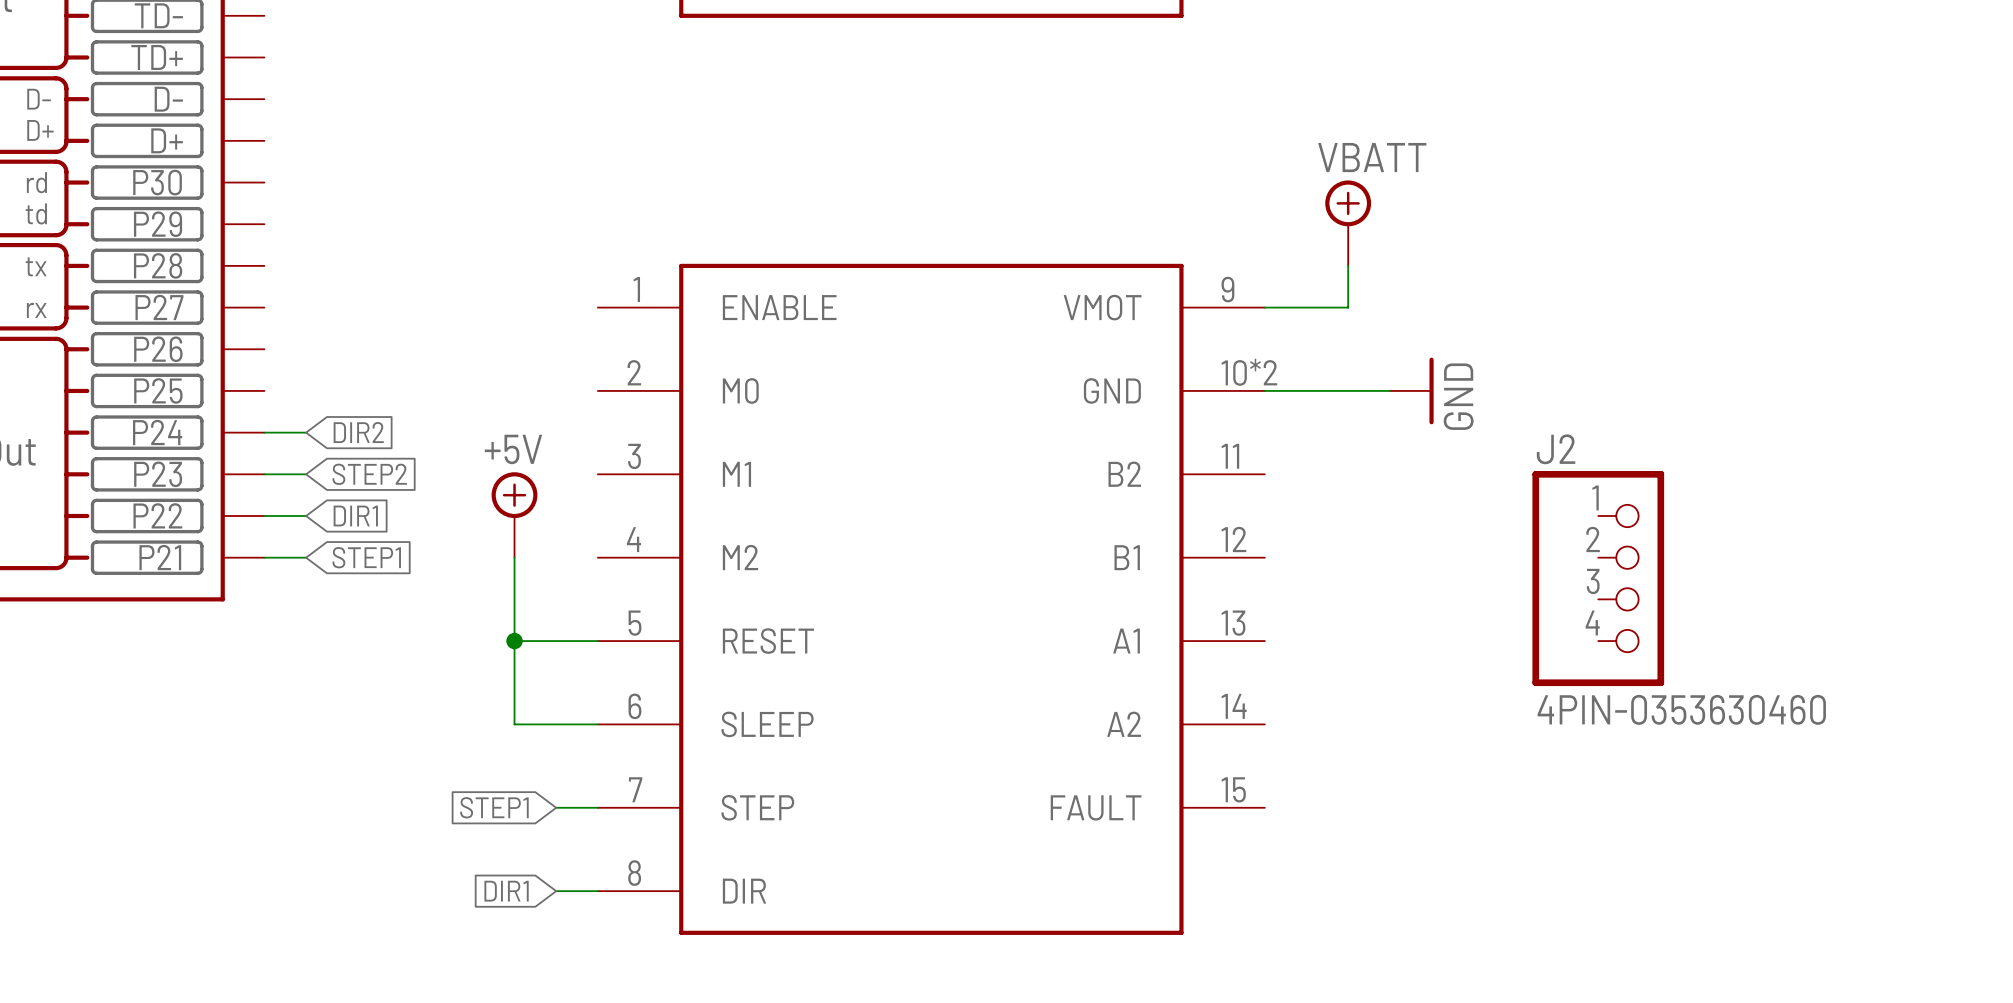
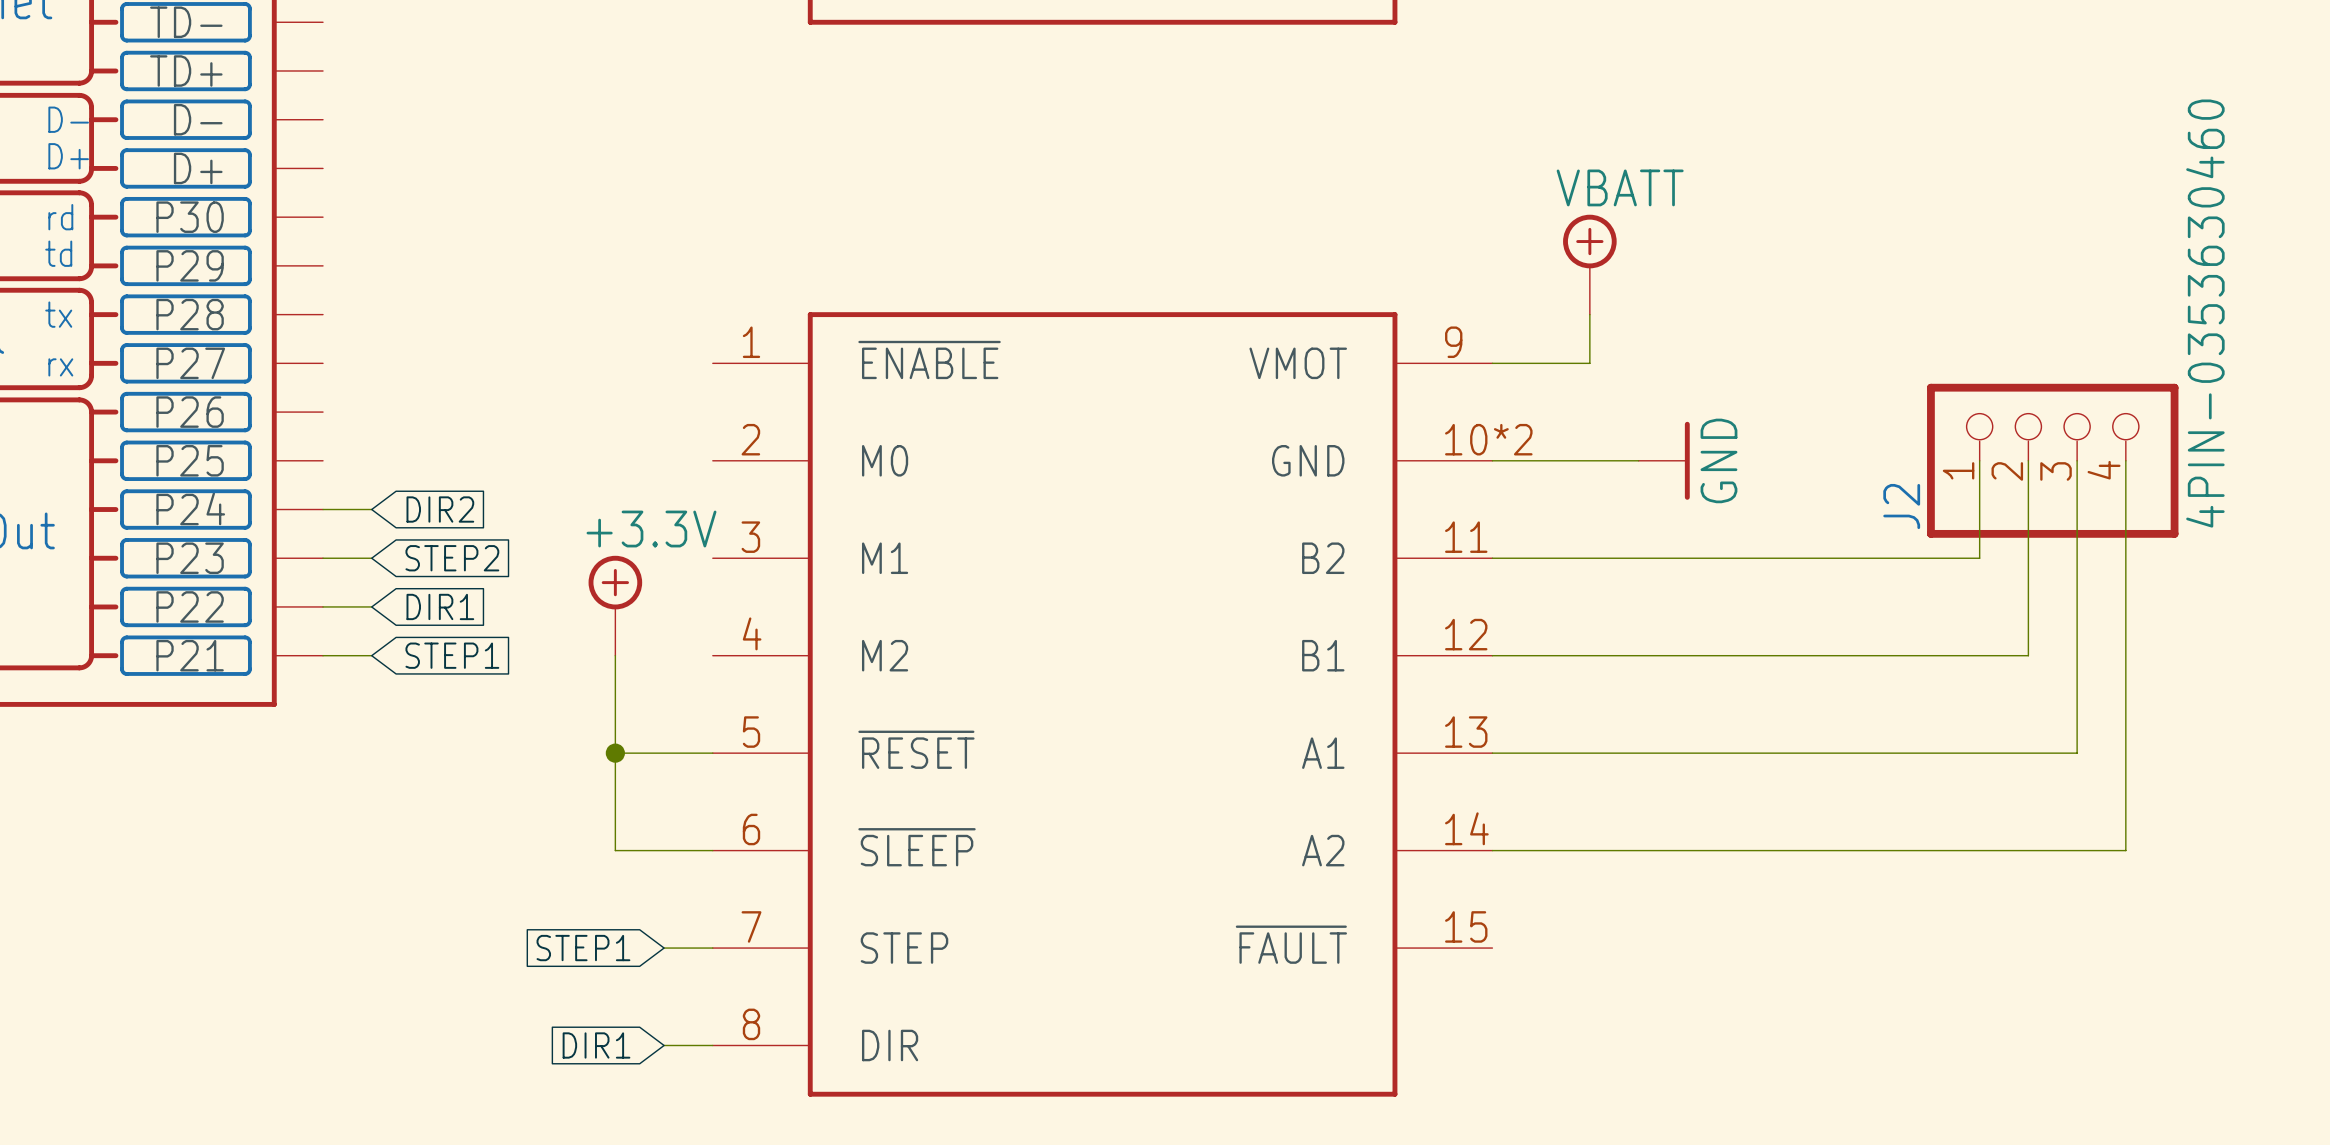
part pin name: ENABLE (779, 307) -> ~{ENABLE} (929, 359)
wire: none -> (1979, 460) (1979, 558) (1492, 558)
wire: none -> (2028, 460) (2028, 655) (1492, 655)
wire: none -> (2077, 460) (2077, 753) (1492, 753)
wire: none -> (2125, 460) (2125, 850) (1492, 850)
power symbol: +5V (514, 514) -> +3.3V (615, 605)
J2 rotation: 0° (1598, 578) -> 90° counterclockwise (2052, 460)
J2 position: (1598, 578) -> (2052, 460)
part pin name: RESET (768, 641) -> ~{RESET} (916, 749)
part pin name: SLEEP (767, 724) -> ~{SLEEP} (917, 847)
part pin name: FAULT (1096, 807) -> ~{FAULT} (1291, 944)

